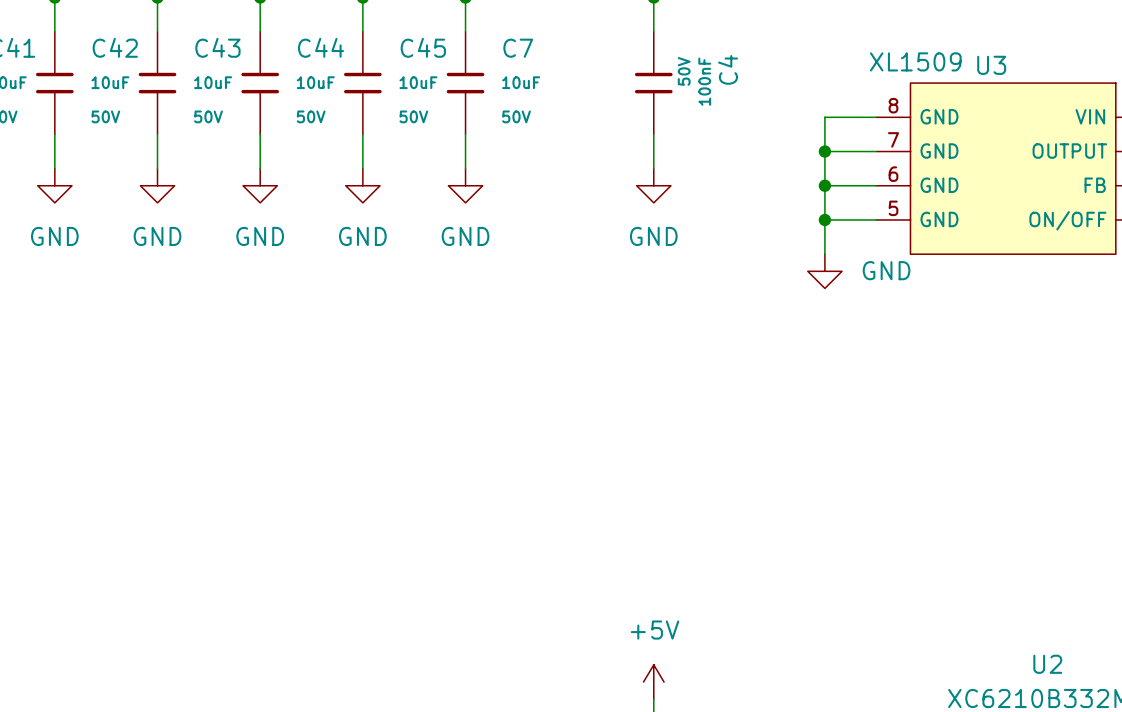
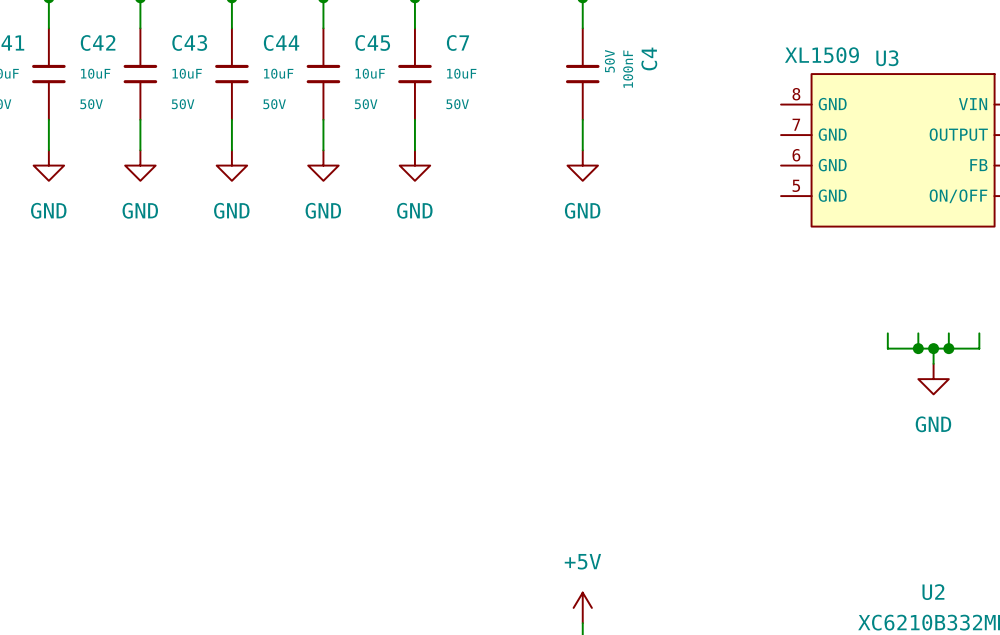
wire: (876, 117) (824, 117) (824, 254) -> none
wire: (824, 151) (876, 151) -> none
junction: (824, 151) -> none
wire: (824, 185) (876, 185) -> none
junction: (824, 185) -> none
wire: (824, 219) (876, 219) -> none
junction: (824, 219) -> none
power symbol: GND (824, 271) -> none
wire: none -> (887, 333) (887, 348) (979, 348) (979, 333)
wire: none -> (918, 333) (918, 348)
wire: none -> (948, 333) (948, 348)
junction: none -> (918, 348)
wire: none -> (933, 348) (933, 363)
junction: none -> (933, 348)
junction: none -> (948, 348)
power symbol: none -> GND (933, 379)

